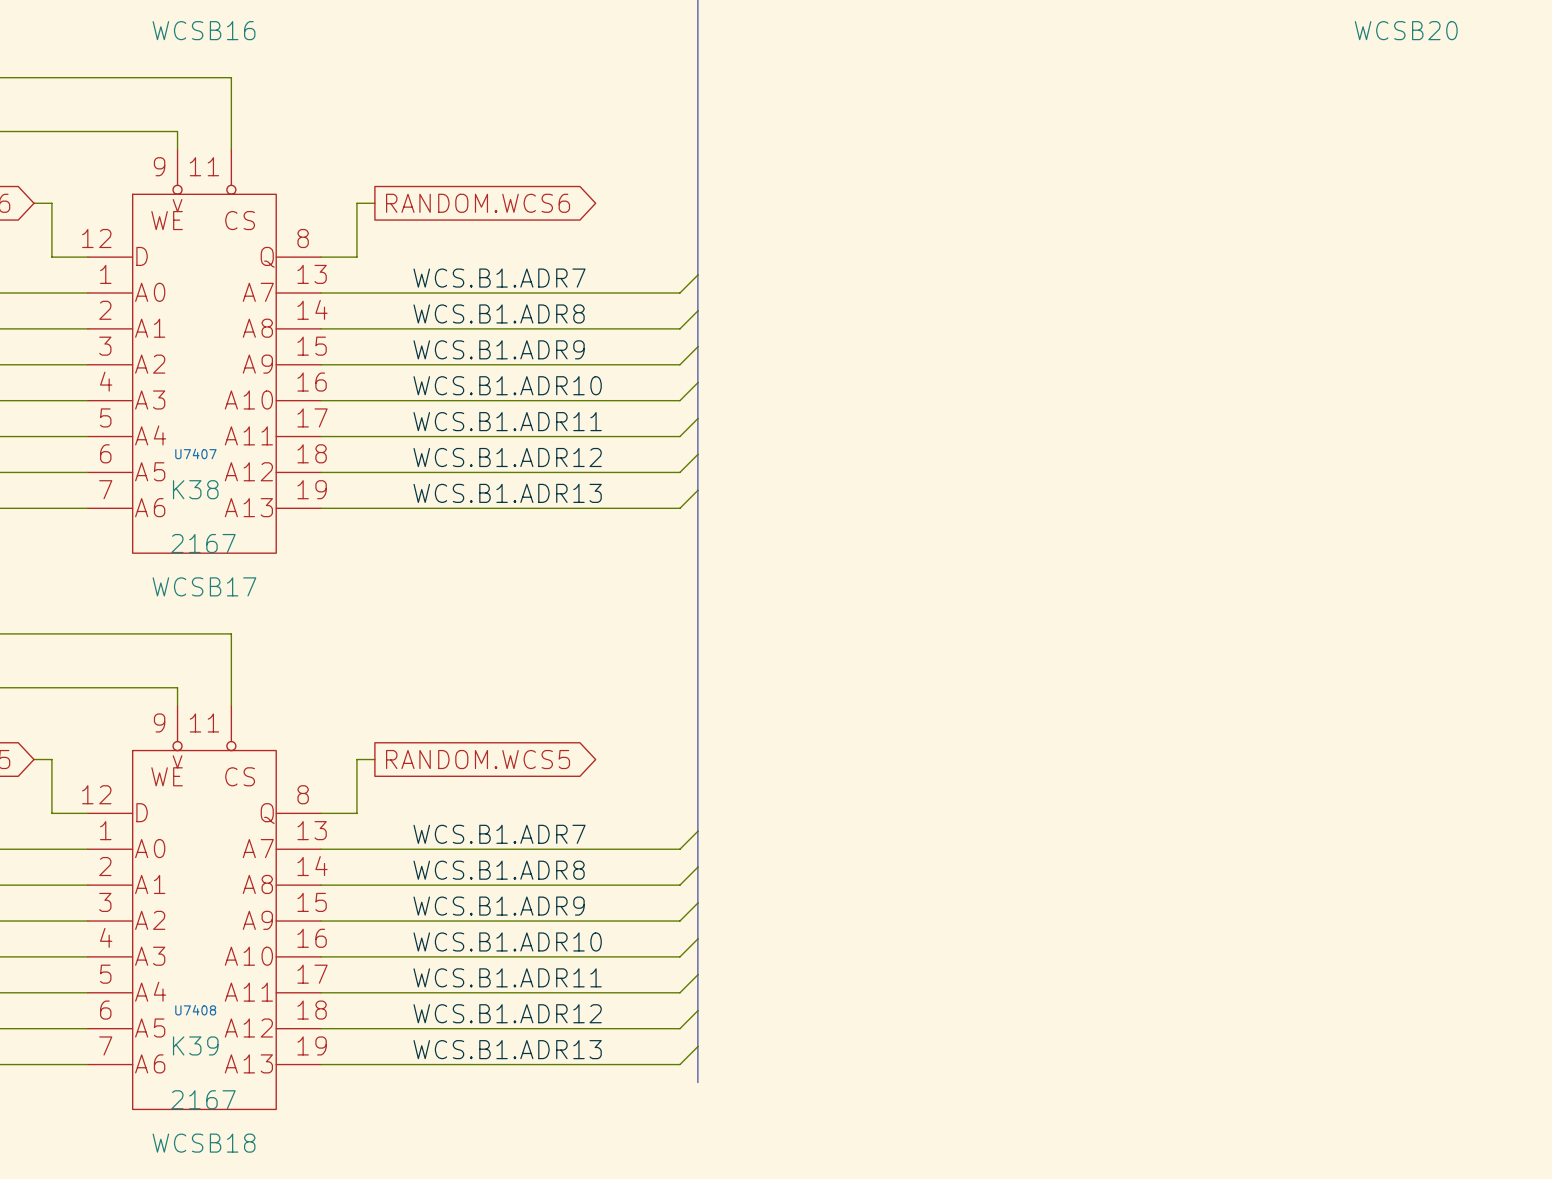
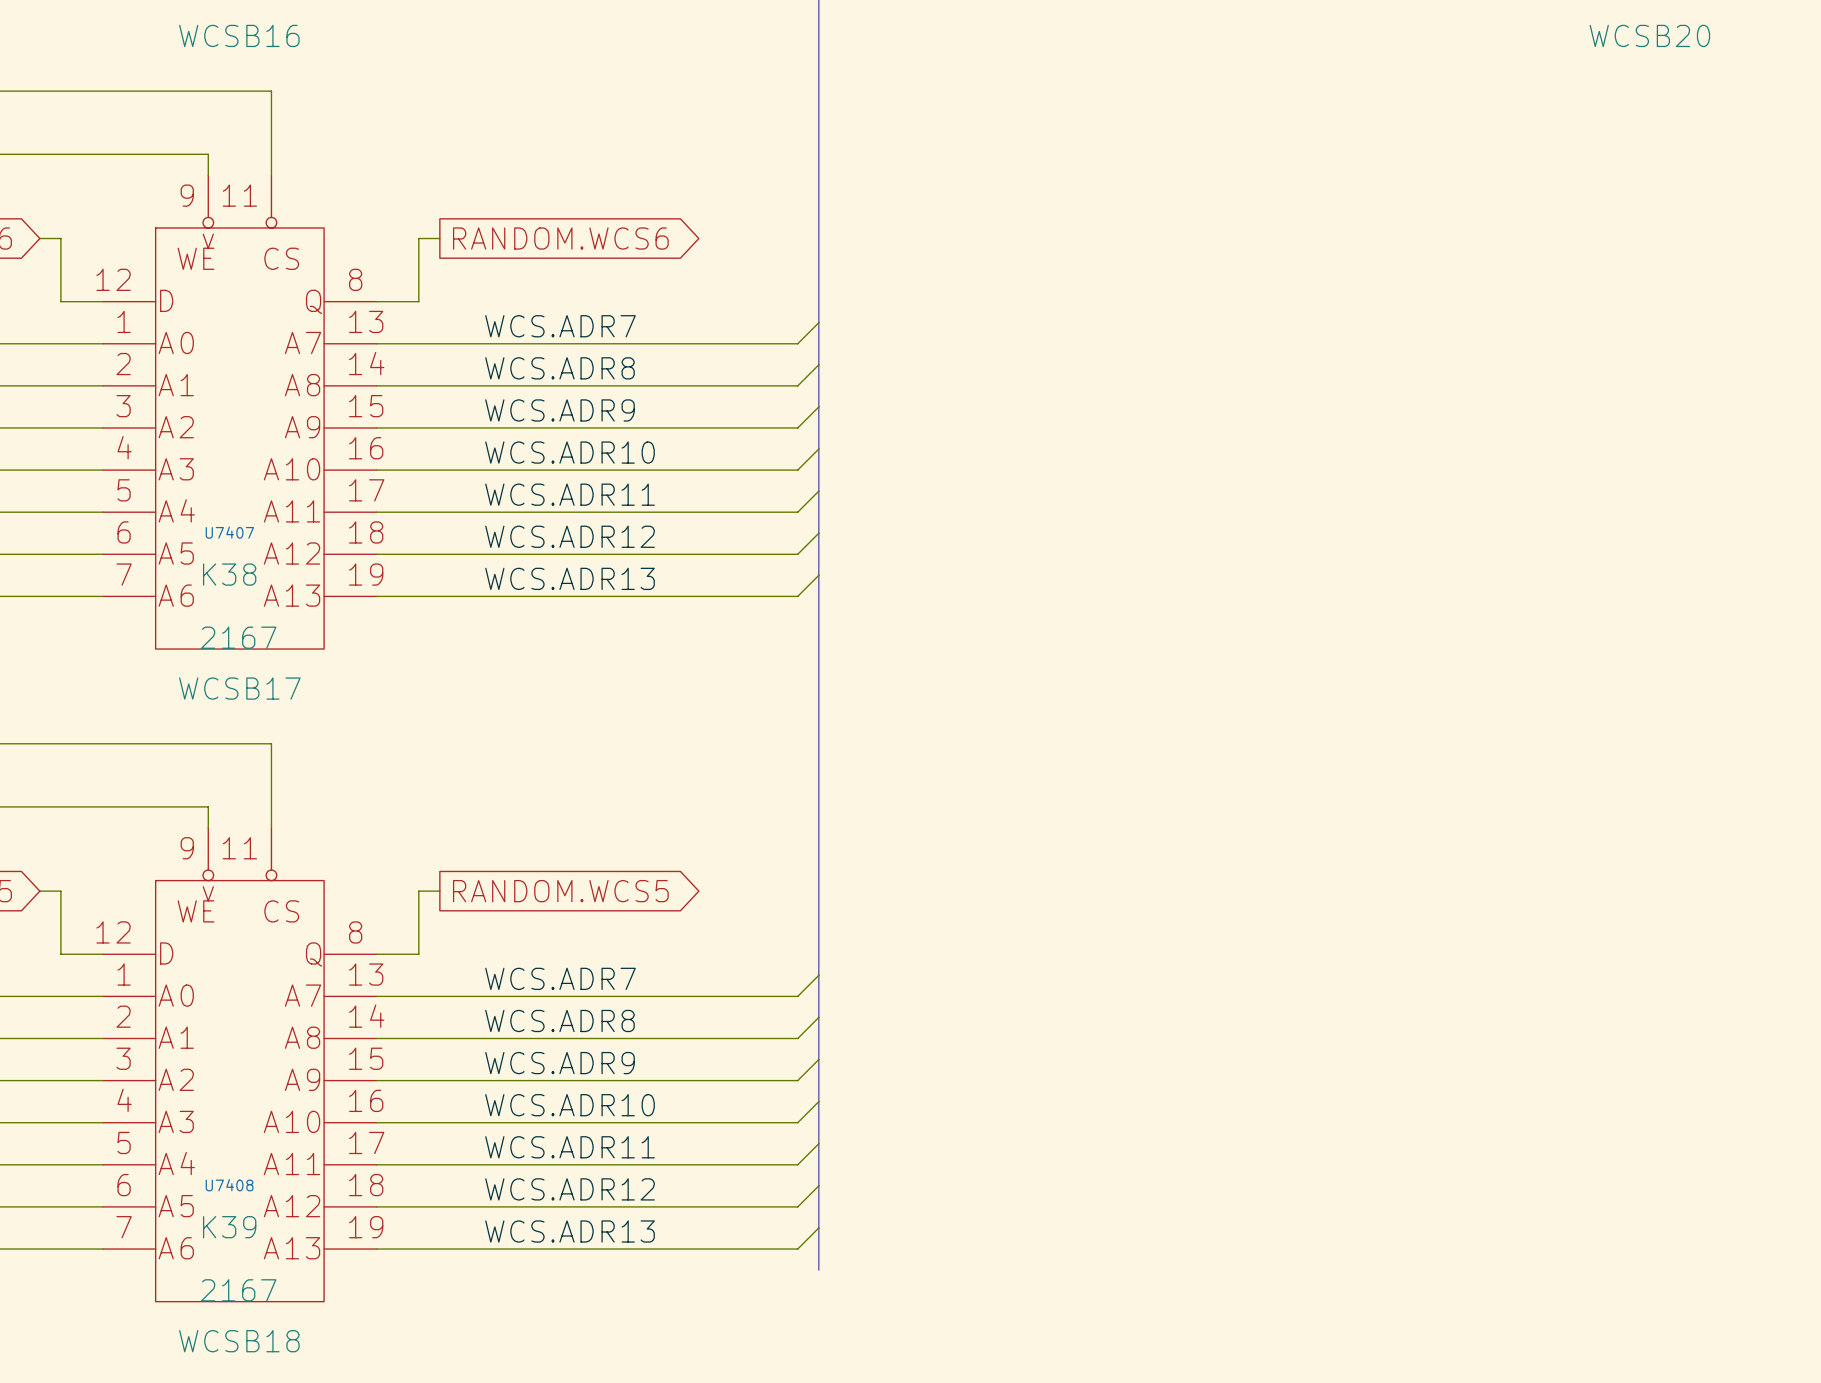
label: WCS.B1.ADR7 (499, 278) -> WCS.ADR7 (560, 326)
label: WCS.B1.ADR8 (499, 313) -> WCS.ADR8 (559, 368)
label: WCS.B1.ADR9 (499, 349) -> WCS.ADR9 (559, 410)
label: WCS.B1.ADR10 (507, 385) -> WCS.ADR10 (570, 452)
label: WCS.B1.ADR11 (507, 421) -> WCS.ADR11 (570, 494)
label: WCS.B1.ADR12 (507, 457) -> WCS.ADR12 (570, 536)
label: WCS.B1.ADR13 (507, 493) -> WCS.ADR13 (570, 578)
label: WCS.B1.ADR7 (499, 834) -> WCS.ADR7 (560, 978)
label: WCS.B1.ADR8 (499, 870) -> WCS.ADR8 (559, 1020)
label: WCS.B1.ADR9 (499, 906) -> WCS.ADR9 (559, 1063)
label: WCS.B1.ADR10 (507, 941) -> WCS.ADR10 (570, 1105)
label: WCS.B1.ADR11 (507, 977) -> WCS.ADR11 (570, 1147)
label: WCS.B1.ADR12 (507, 1013) -> WCS.ADR12 (570, 1189)
label: WCS.B1.ADR13 (507, 1049) -> WCS.ADR13 (570, 1231)

